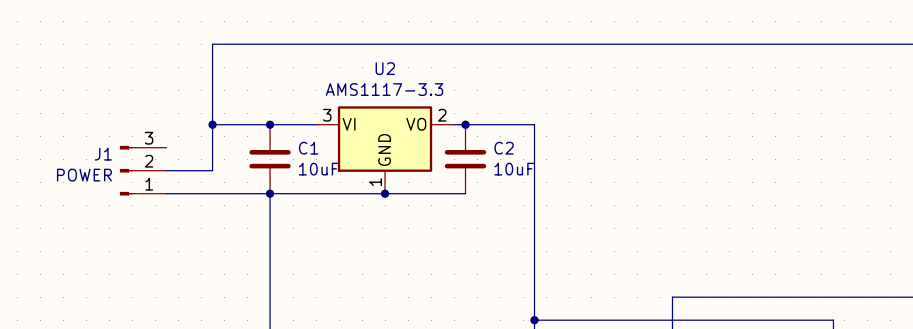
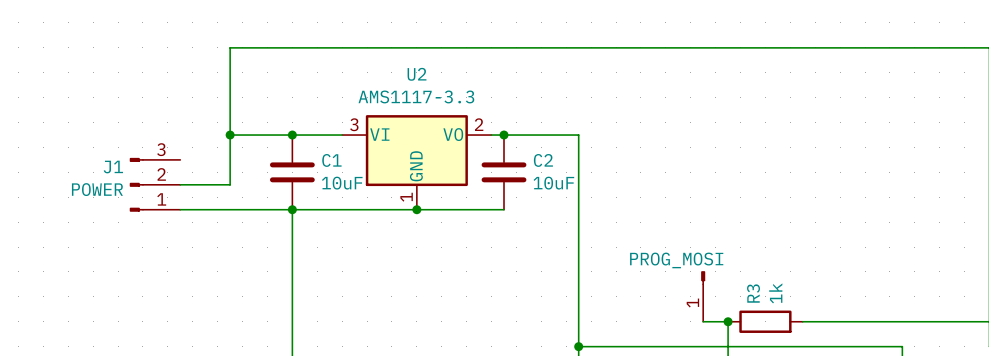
part: none -> PROG_MOSI (703, 296)
wire: (672, 297) (741, 297) -> (728, 321) (703, 321)
junction: none -> (728, 321)
R3: none -> 1k (765, 321)

